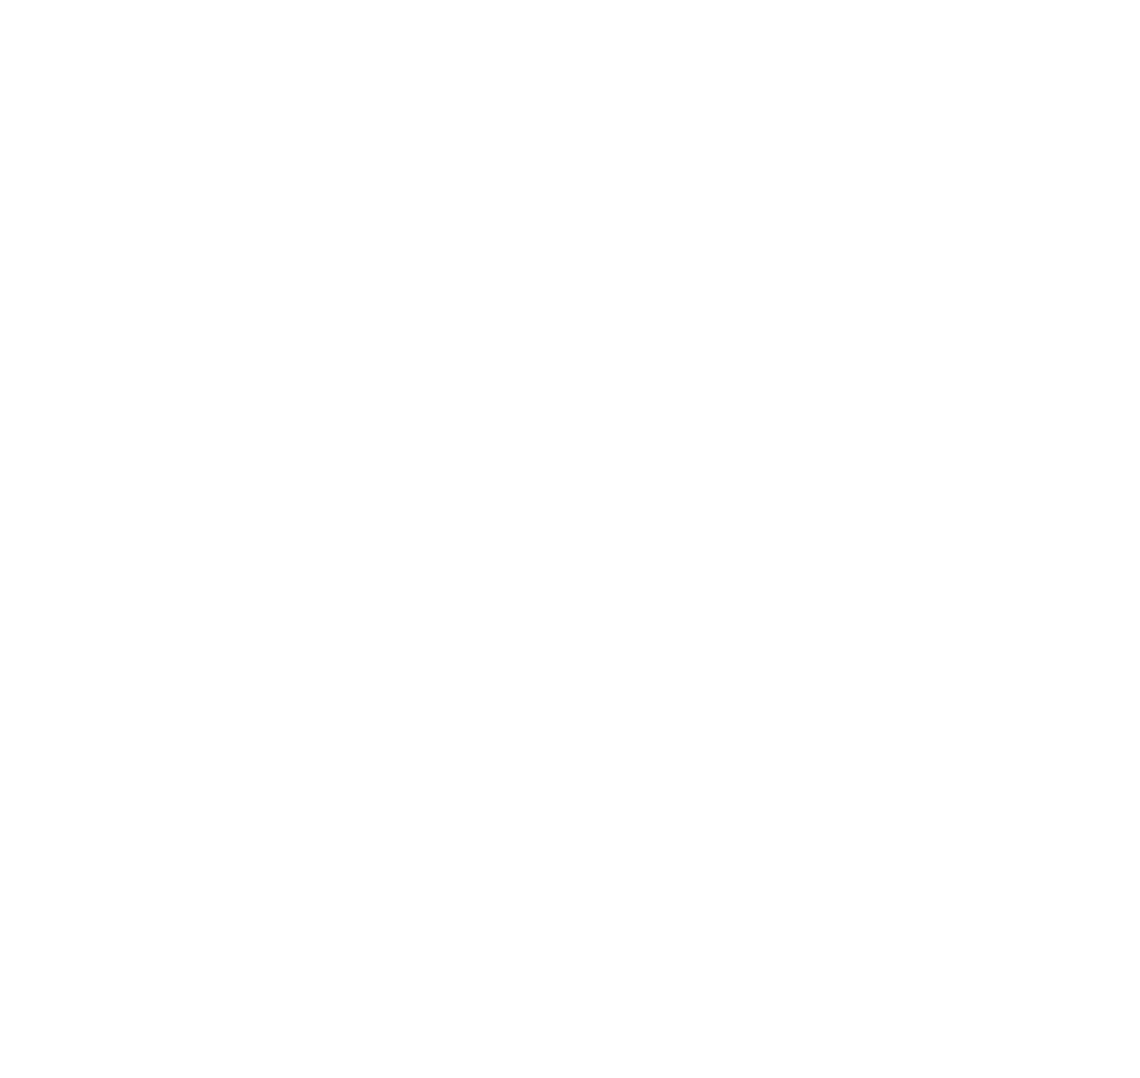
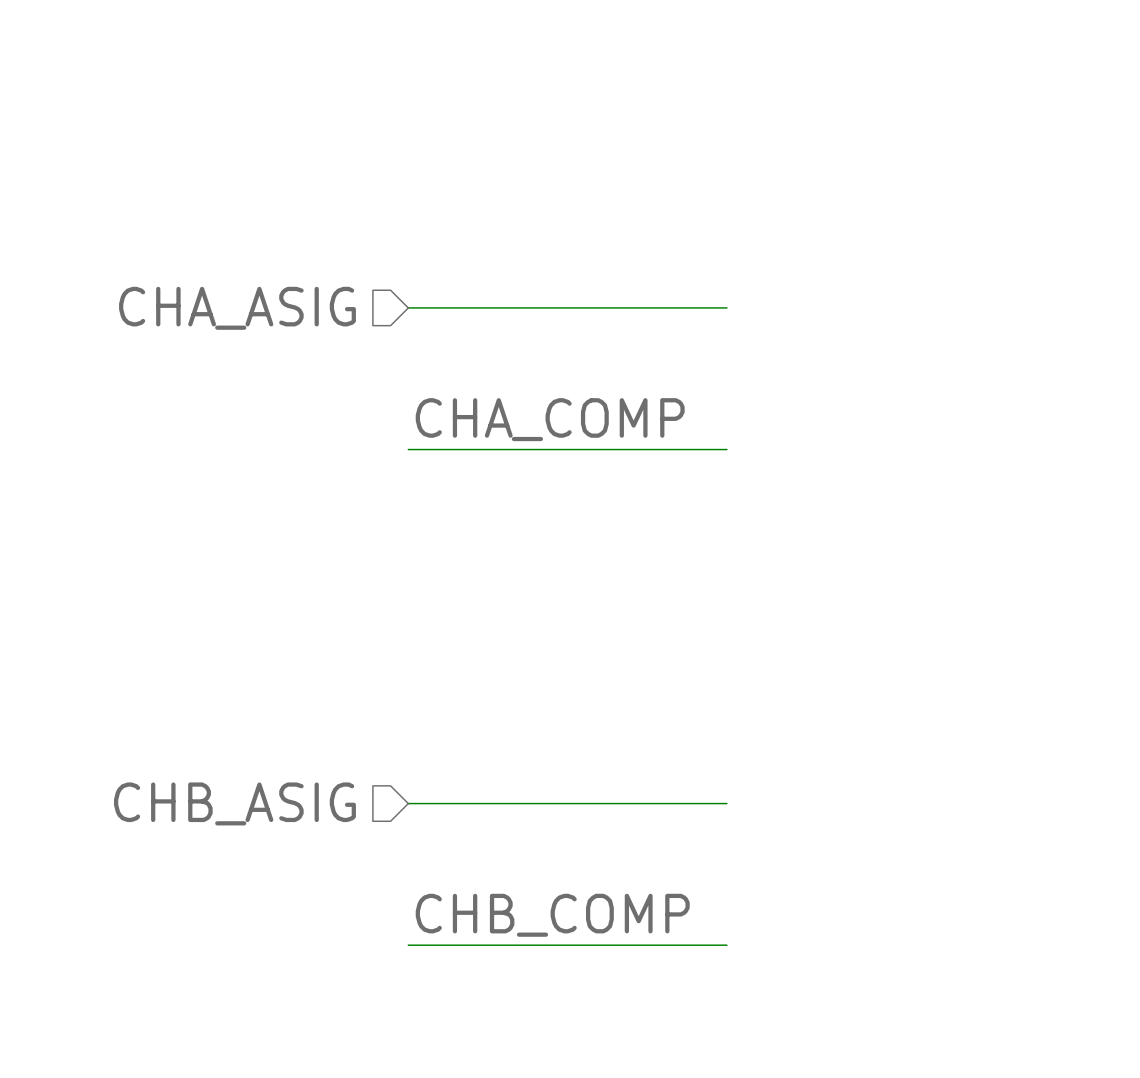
wire: none -> (408, 307) (726, 307)
hierarchical label: none -> CHA_ASIG (237, 308)
label: none -> CHA_COMP (550, 419)
wire: none -> (408, 449) (726, 449)
hierarchical label: none -> CHB_ASIG (234, 803)
wire: none -> (408, 803) (726, 803)
label: none -> CHB_COMP (552, 915)
wire: none -> (408, 945) (726, 945)

